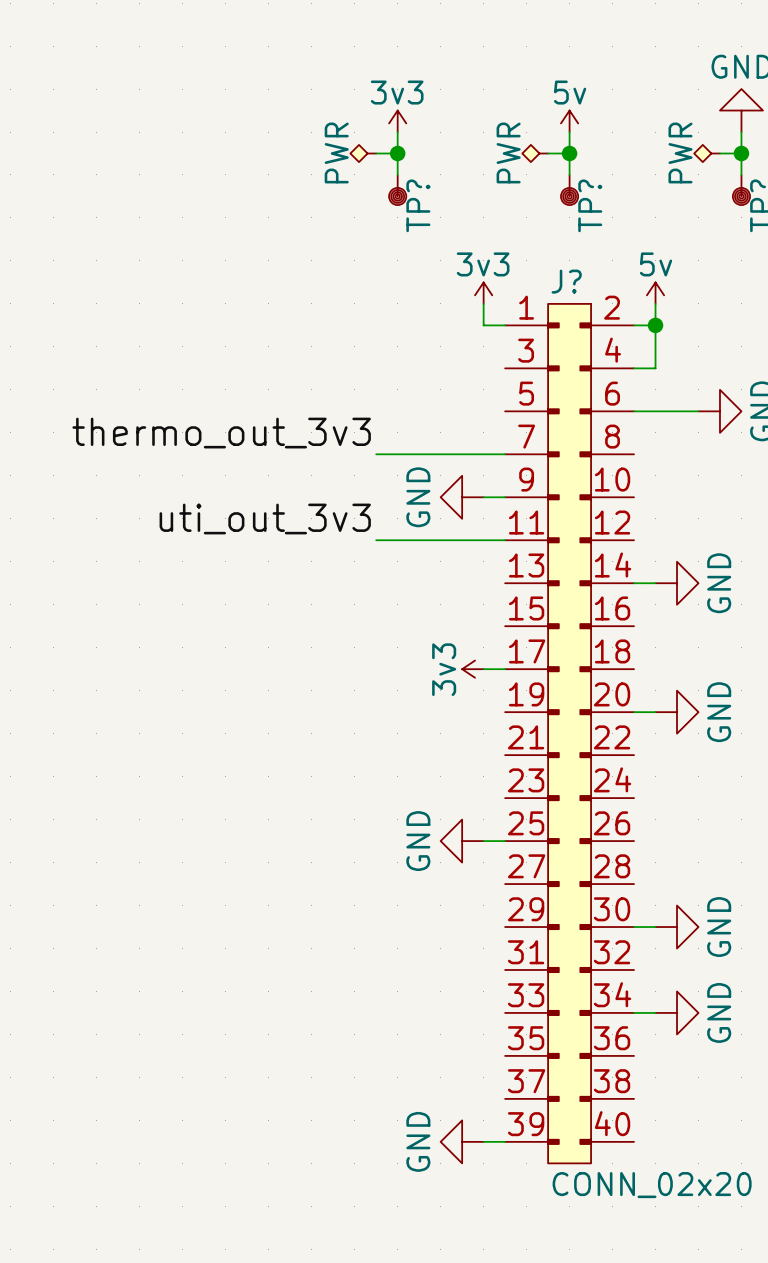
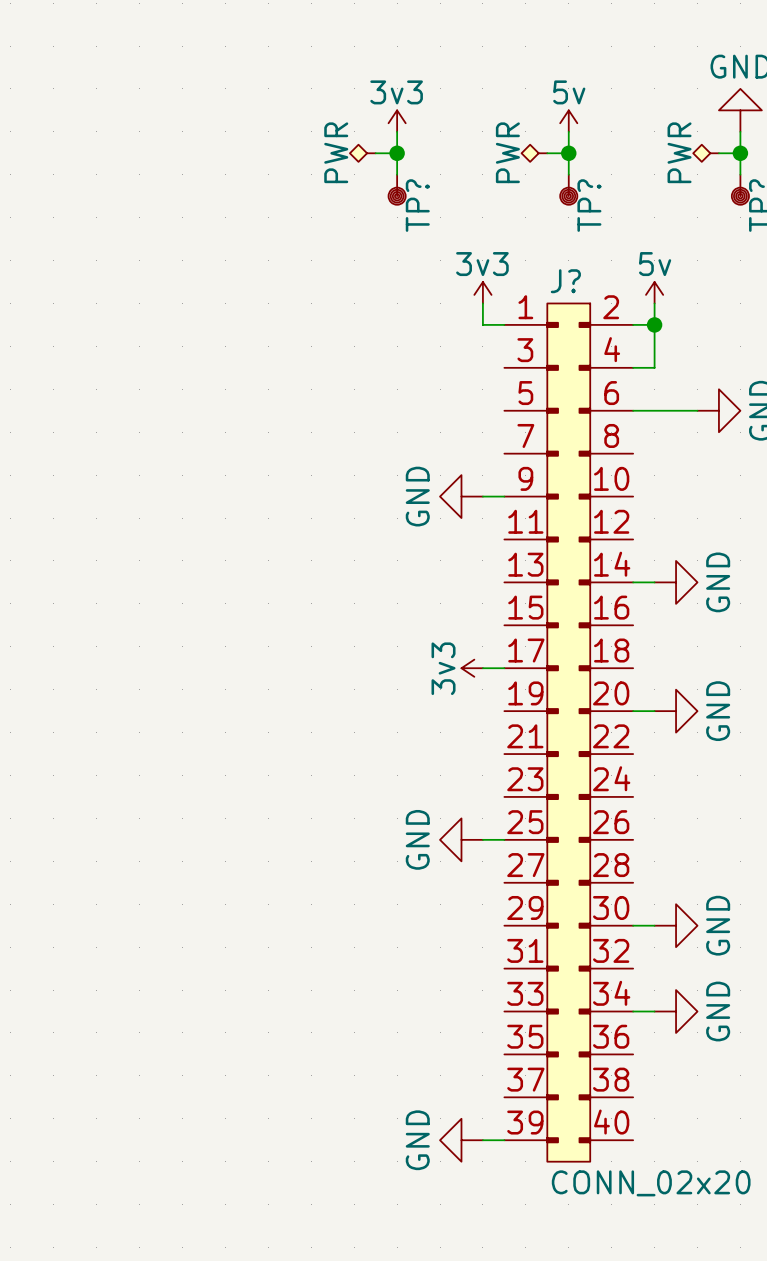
label: thermo_out_3v3 (221, 433) -> none
wire: (376, 454) (505, 454) -> none
label: uti_out_3v3 (265, 518) -> none
wire: (376, 540) (505, 540) -> none

